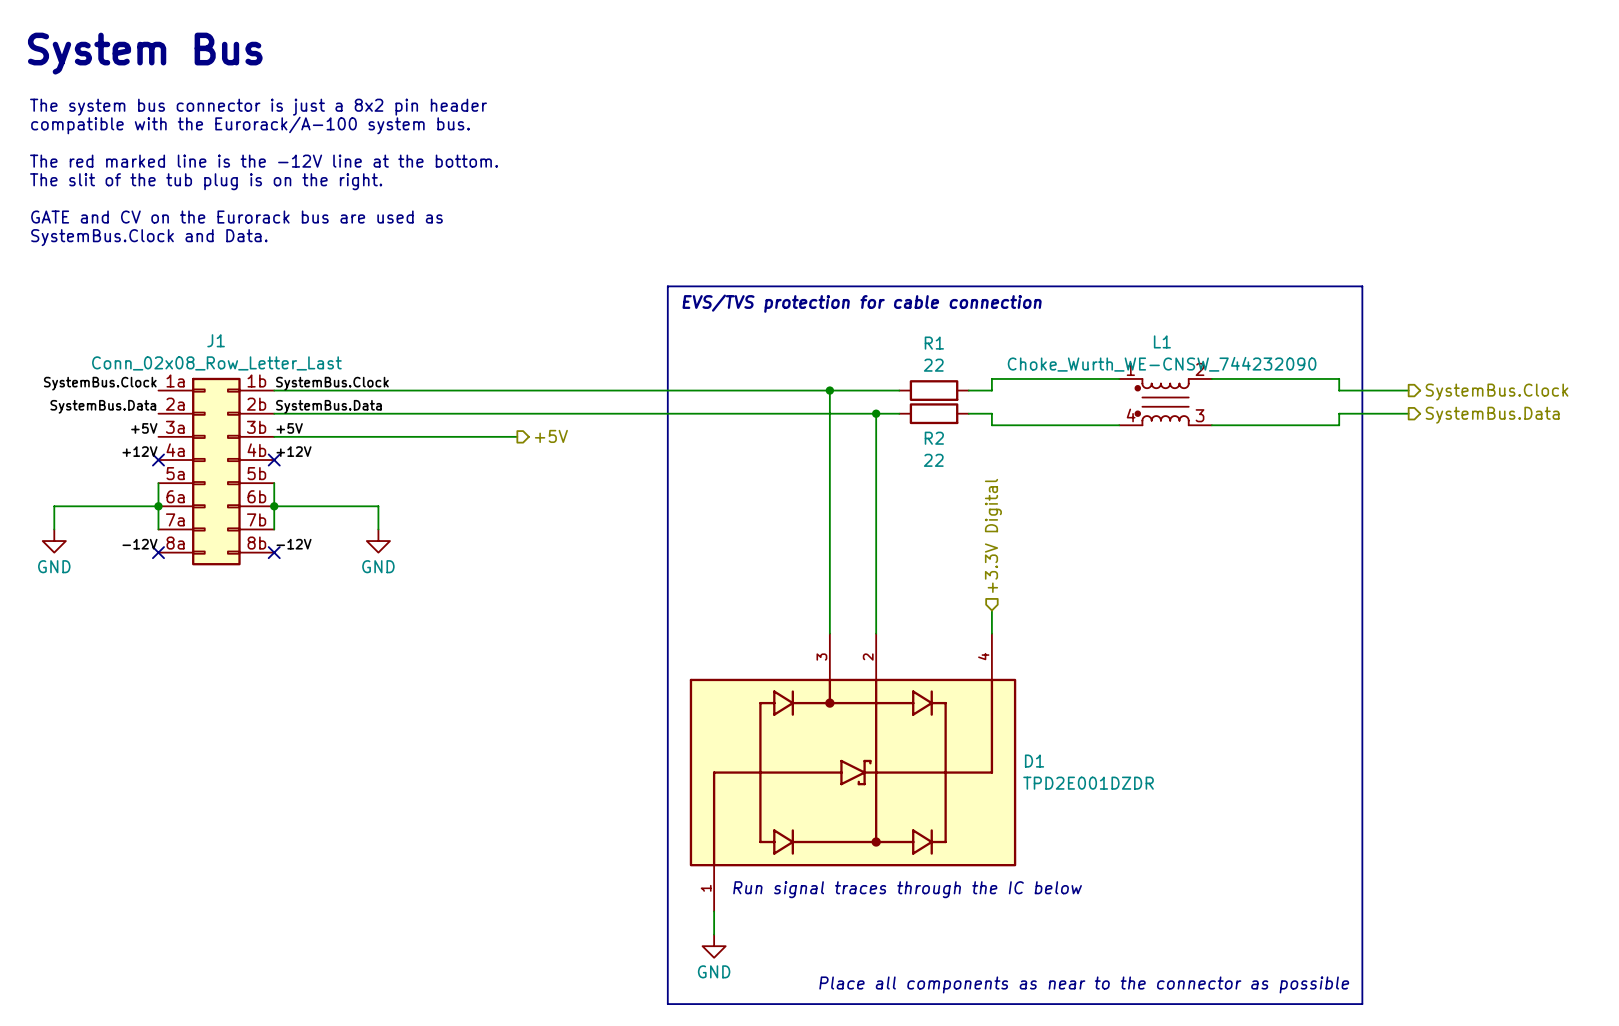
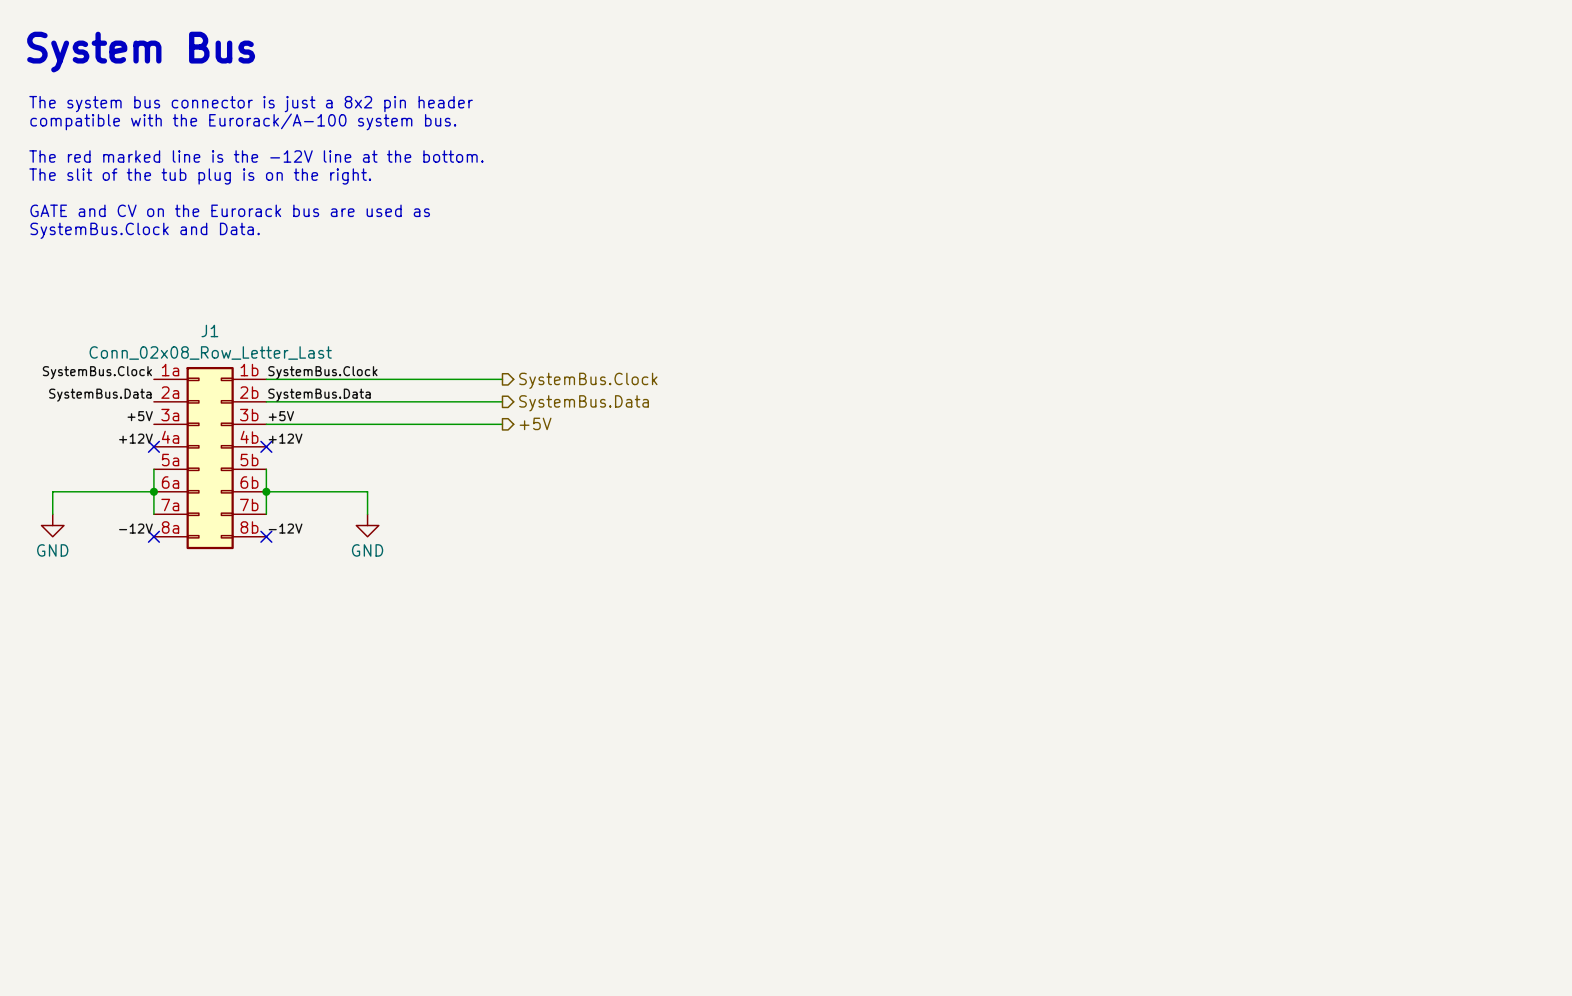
line: (667, 286) (1362, 286) (1362, 1004) (667, 1004) (667, 286) -> none
text: EVS/TVS protection for cable connection (862, 303) -> none
wire: (1119, 378) (991, 378) (991, 390) (968, 390) -> none
wire: (1211, 378) (1339, 378) (1339, 390) (1408, 390) -> none
wire: (517, 390) (899, 390) -> none
wire: (829, 390) (829, 633) -> none
junction: (829, 390) -> none
R1: 22 (934, 390) -> none
hierarchical label: none -> SystemBus.Clock (588, 380)
hierarchical label: SystemBus.Clock (1497, 392) -> none
L1: Choke_Wurth_WE-CNSW_744232090 (1165, 402) -> none
wire: (517, 413) (899, 413) -> none
wire: (876, 413) (876, 633) -> none
junction: (876, 413) -> none
R2: 22 (934, 413) -> none
wire: (968, 413) (991, 413) (991, 425) (1119, 425) -> none
wire: (1408, 413) (1339, 413) (1339, 425) (1211, 425) -> none
hierarchical label: none -> SystemBus.Data (584, 403)
hierarchical label: SystemBus.Data (1492, 415) -> none
hierarchical label: +3.3V Digital (993, 535) -> none
wire: (991, 610) (991, 633) -> none
D1: TPD2E001DZDR (853, 772) -> none
text: Run signal traces through the IC below (907, 889) -> none
wire: (714, 911) (714, 934) -> none
power symbol: GND (714, 946) -> none
text: Place all components as near to the connector as possible (1084, 984) -> none

